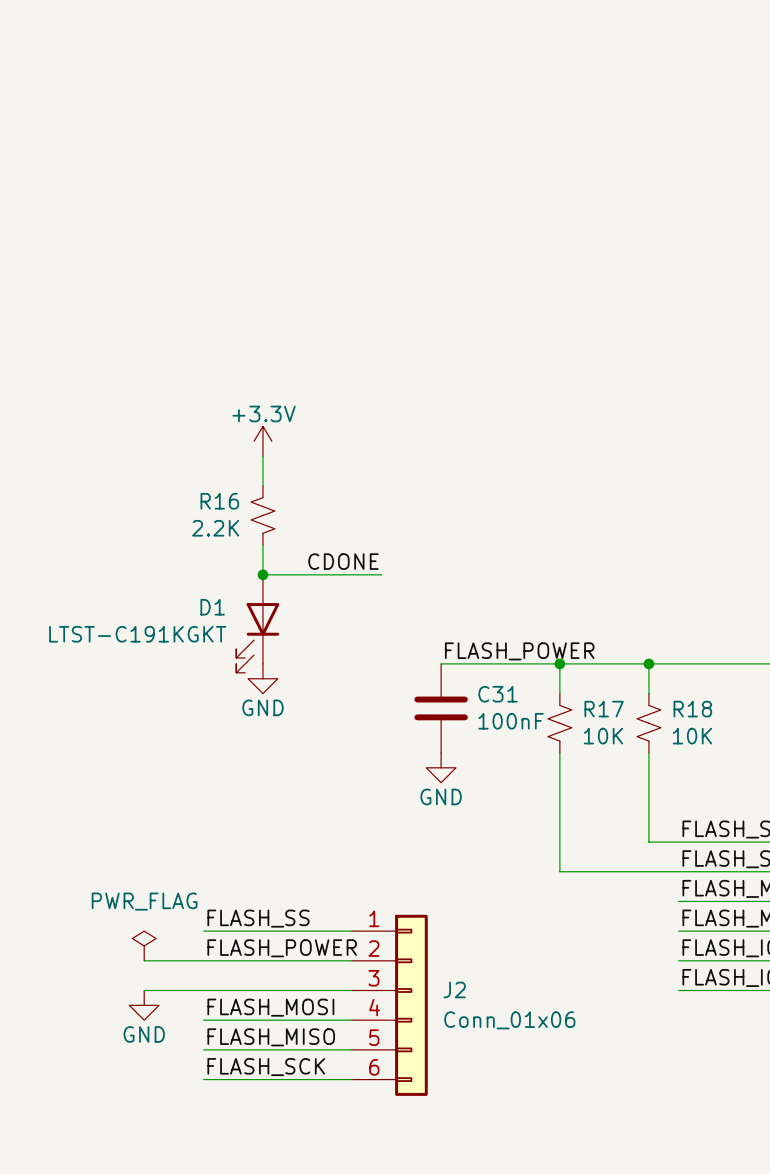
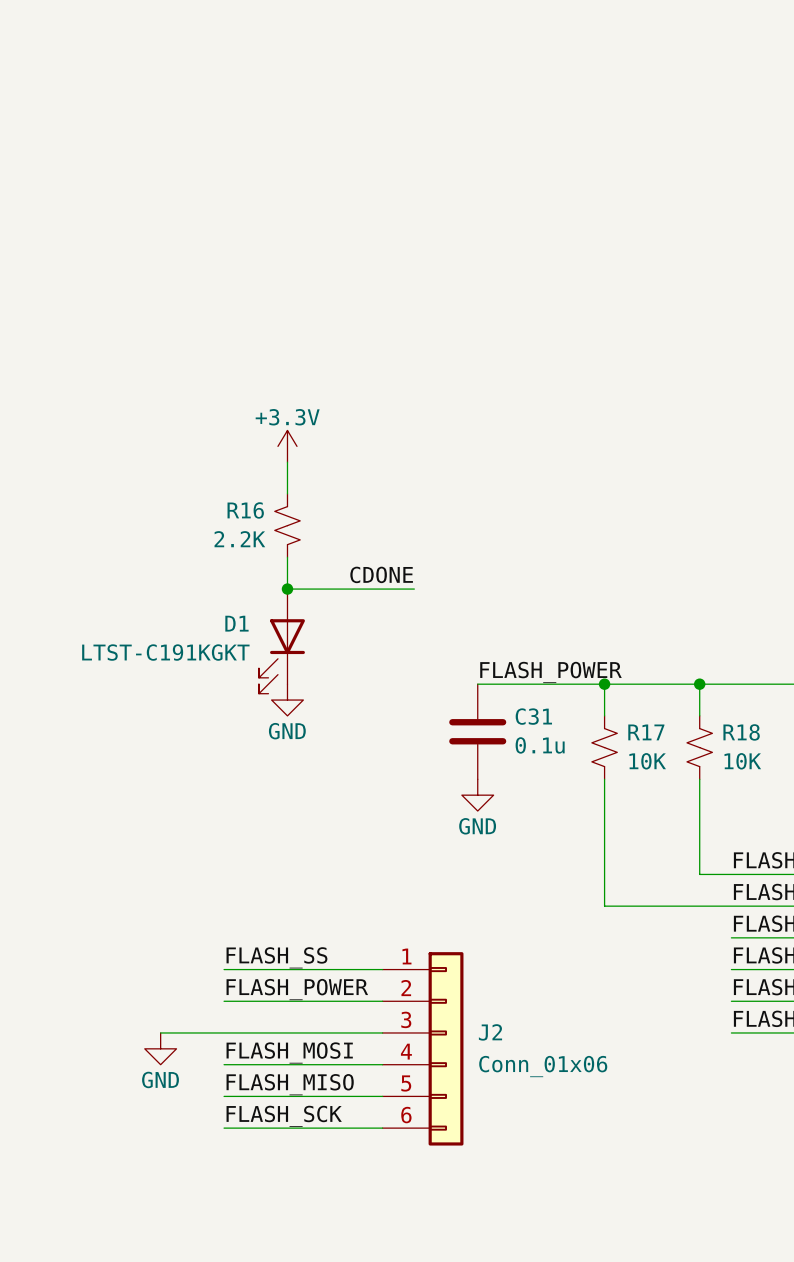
C31 value: 100nF (511, 721) -> 0.1u (540, 745)
power symbol: PWR_FLAG (144, 945) -> none
wire: (144, 960) (203, 960) -> none

